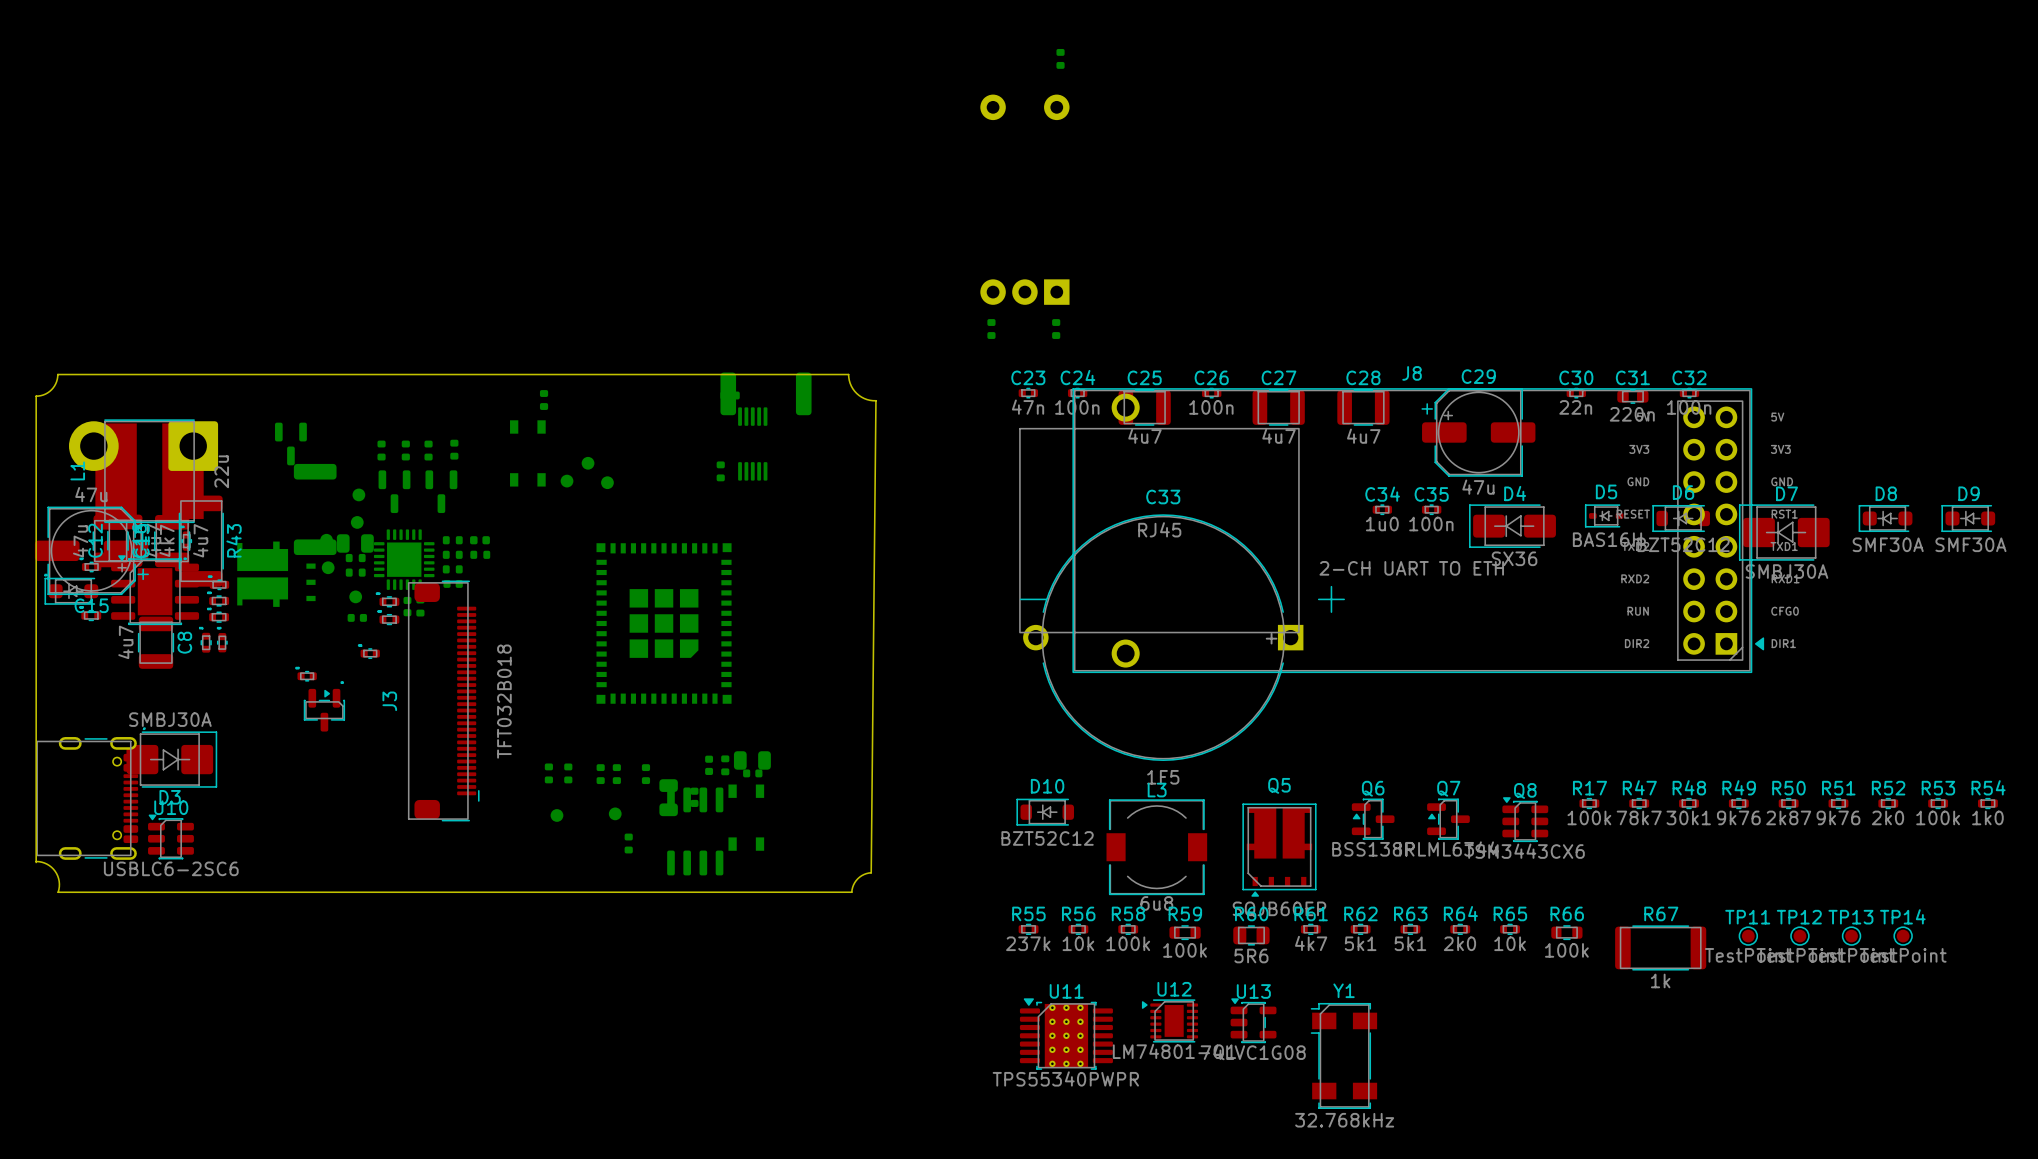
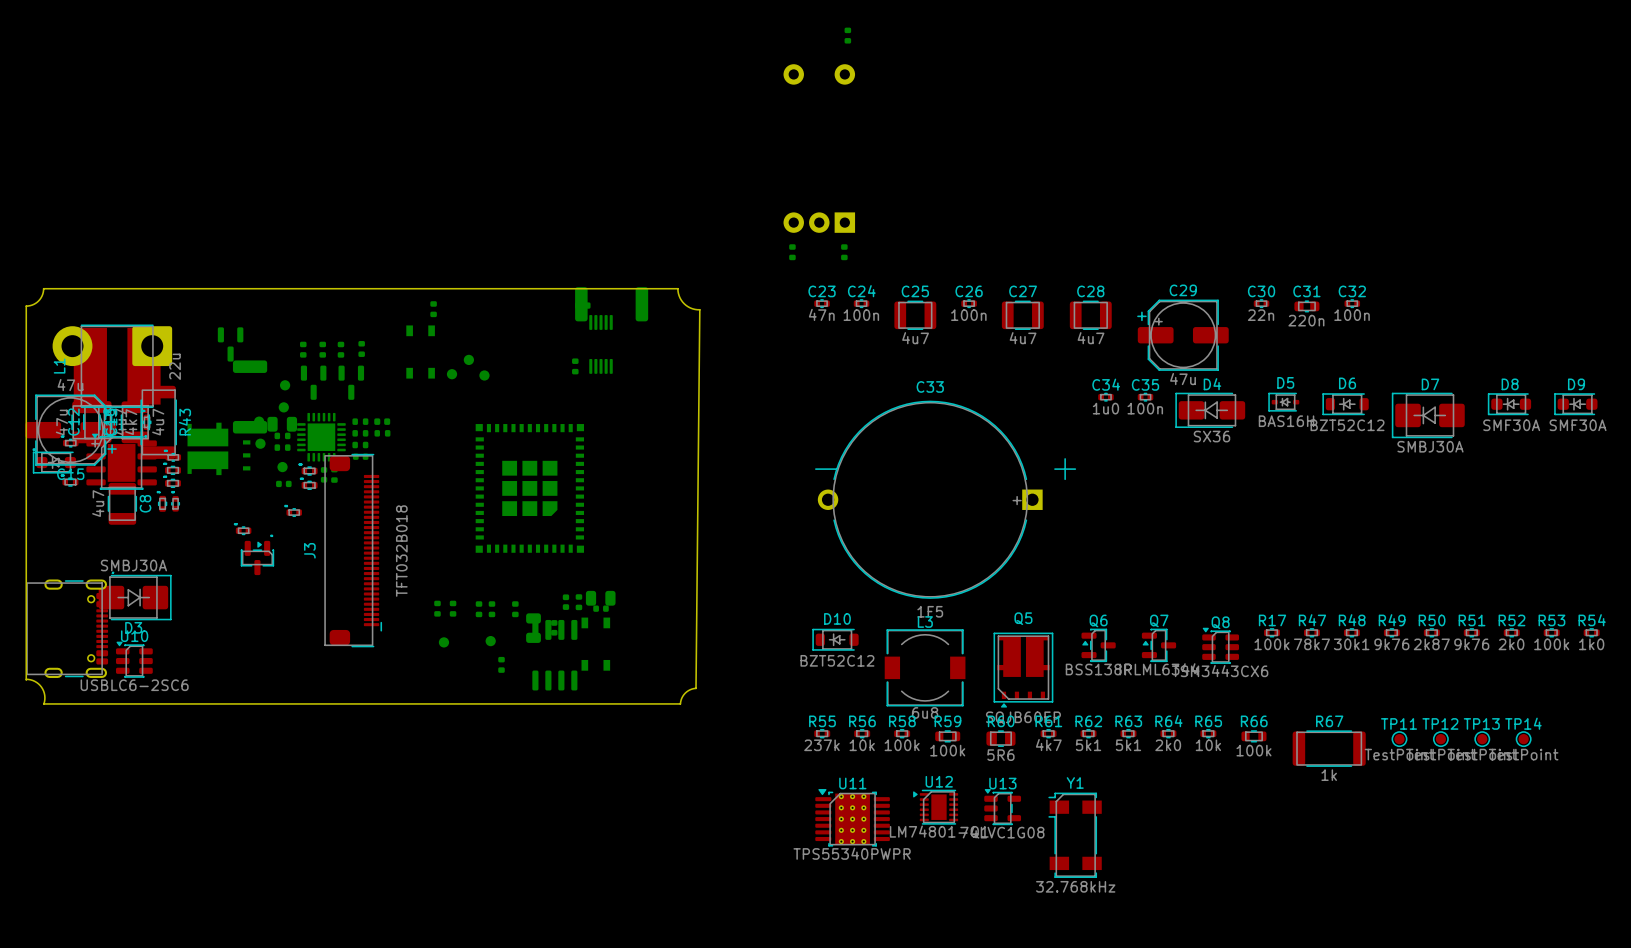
J8: 2-CH UART TO ETH (1391, 530) -> none

